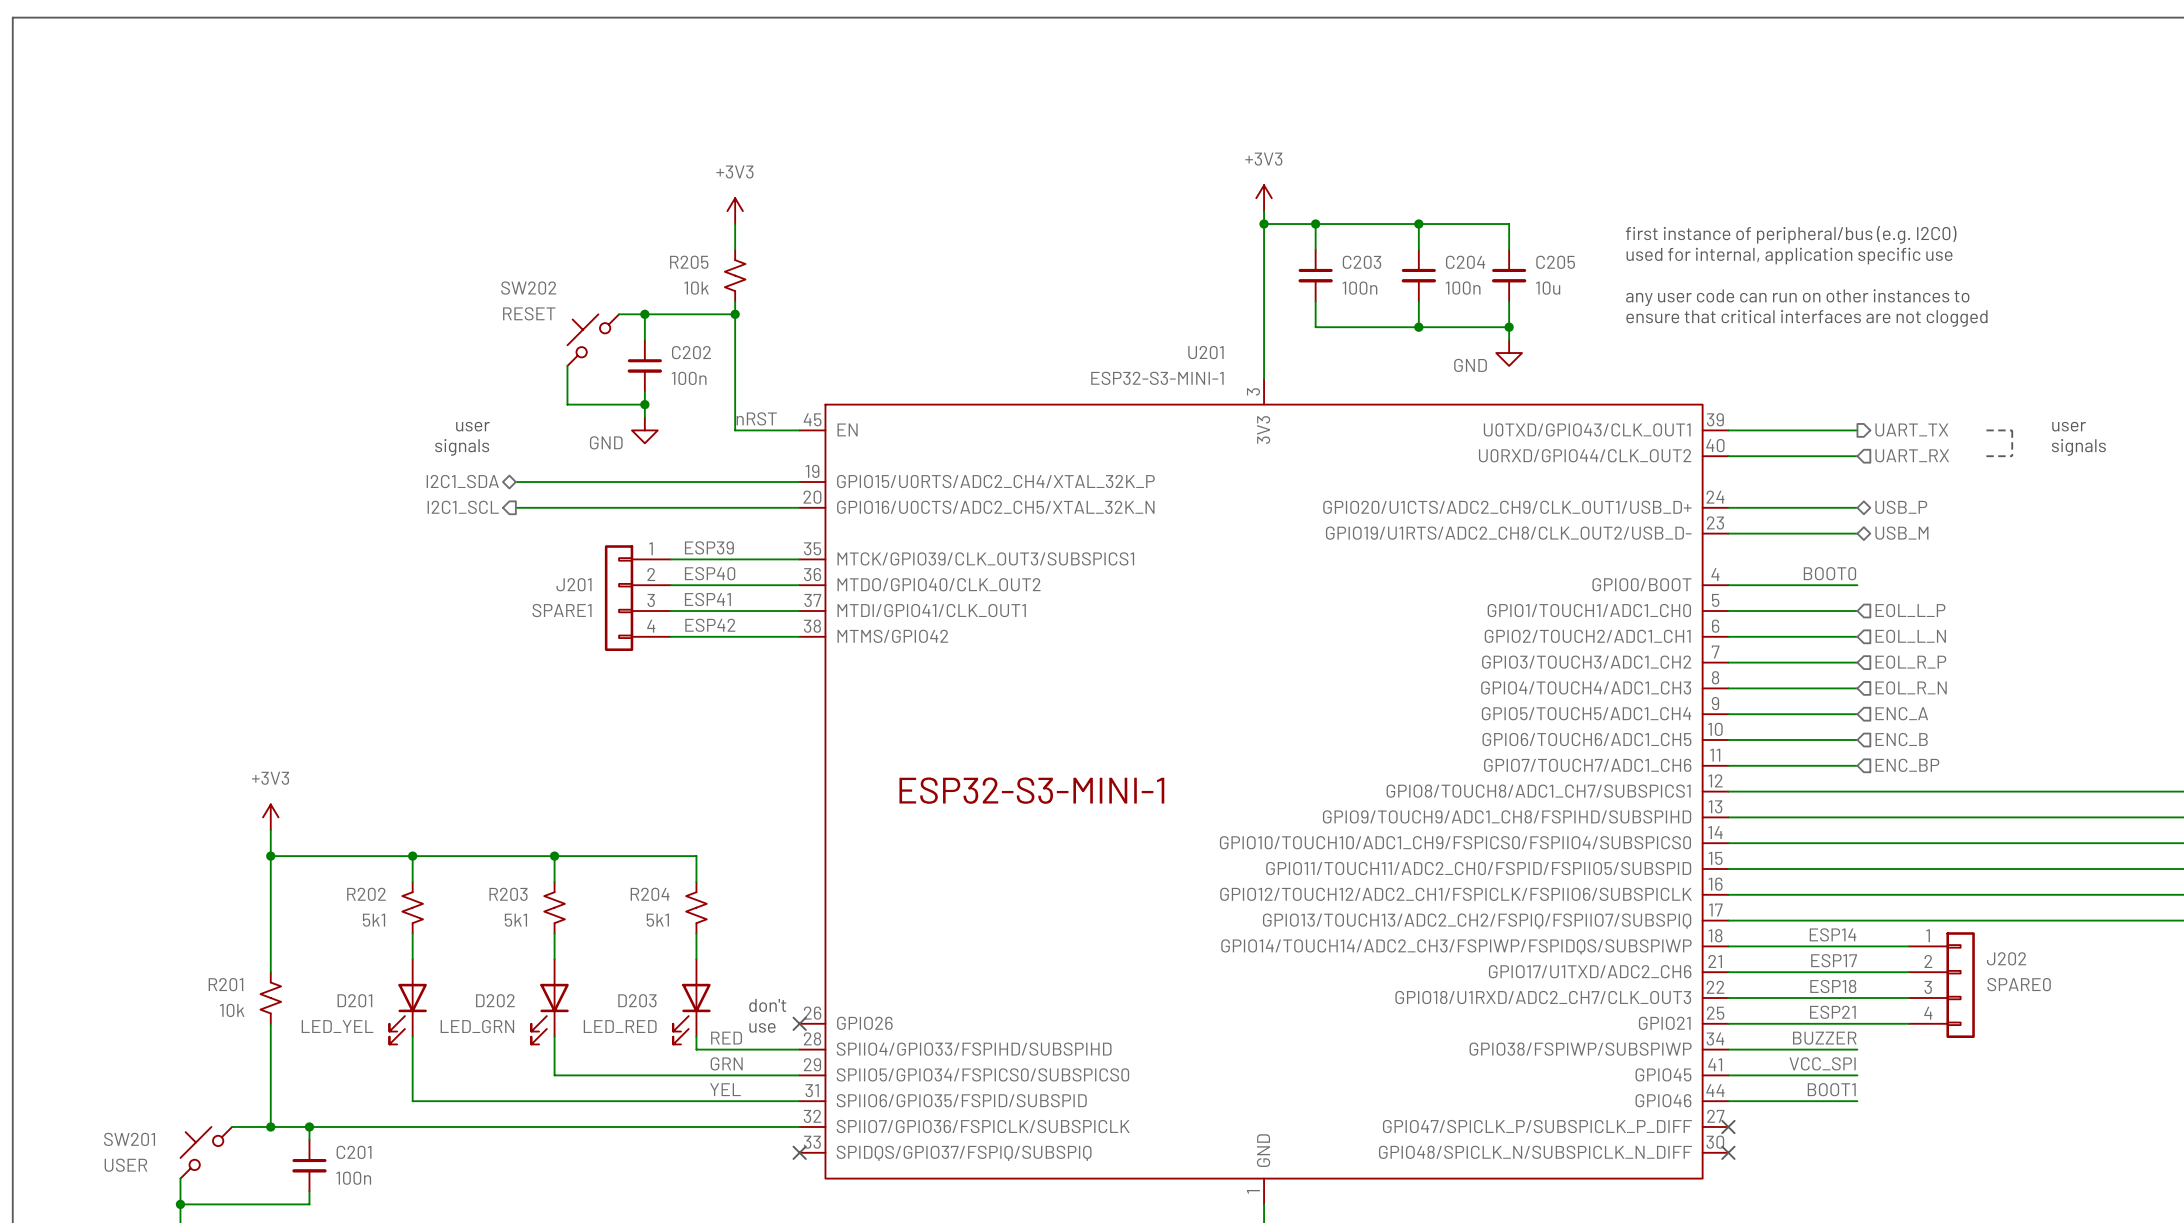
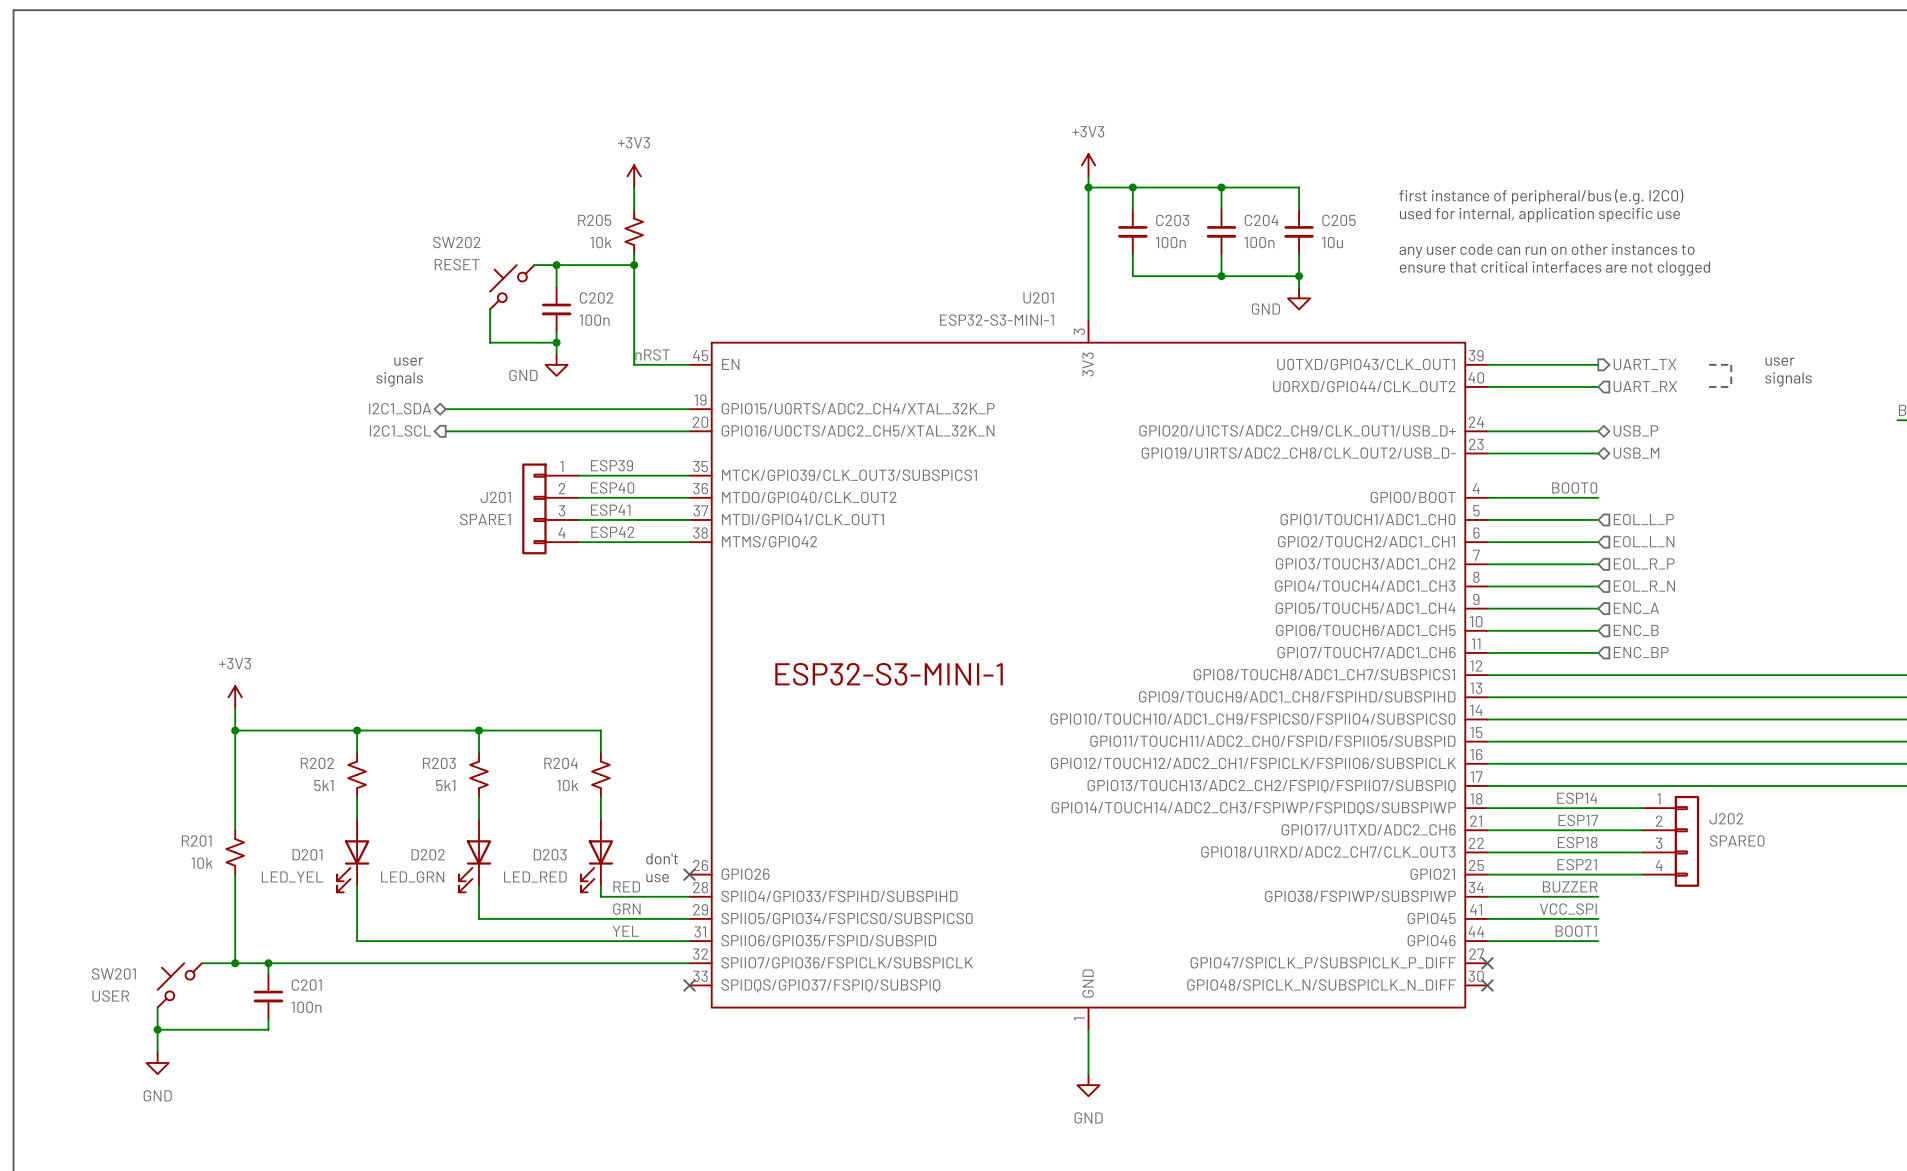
R204 flip: as is (696, 907) -> left-right (600, 774)
R204 value: 5k1 (657, 920) -> 10k (567, 785)

